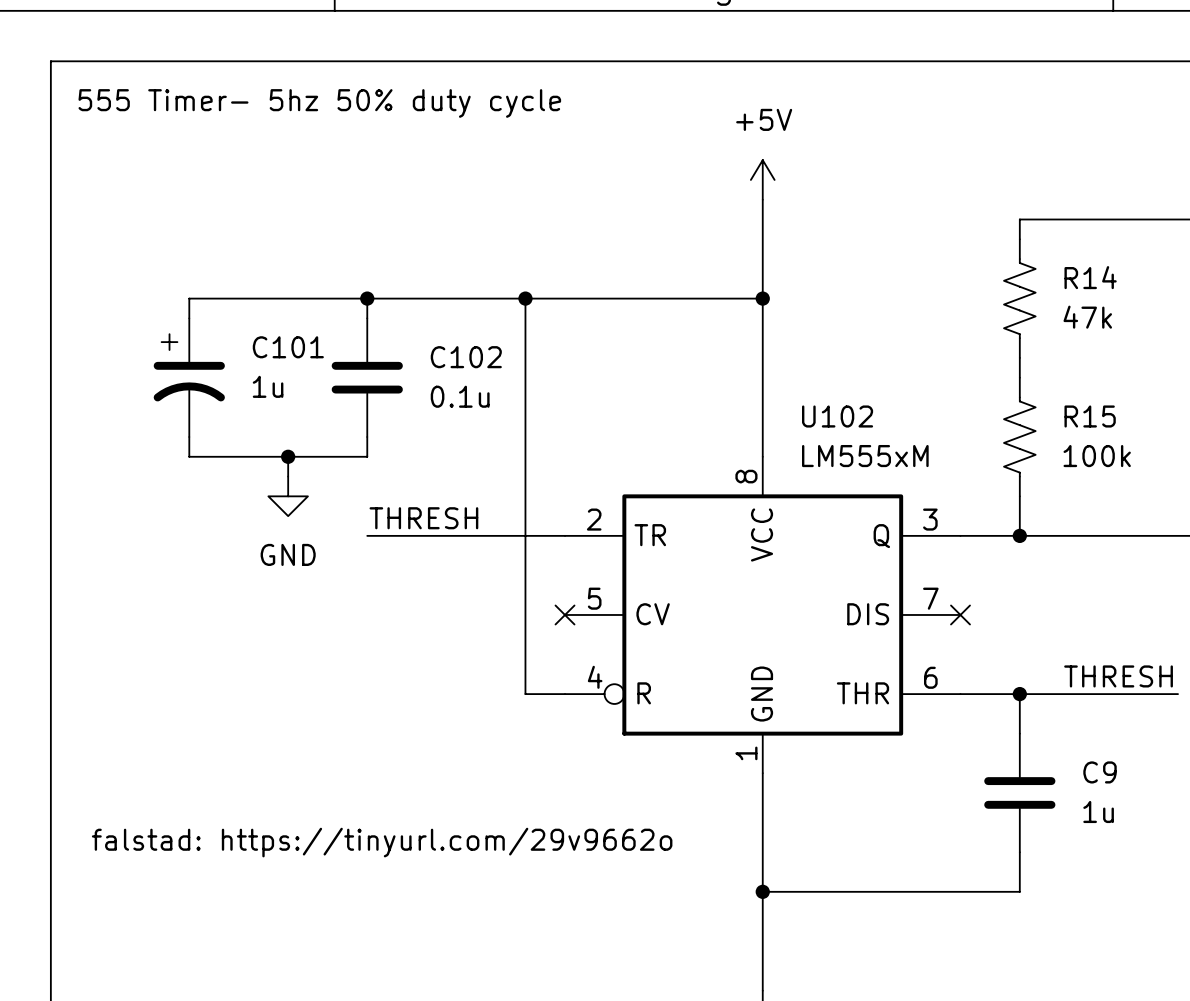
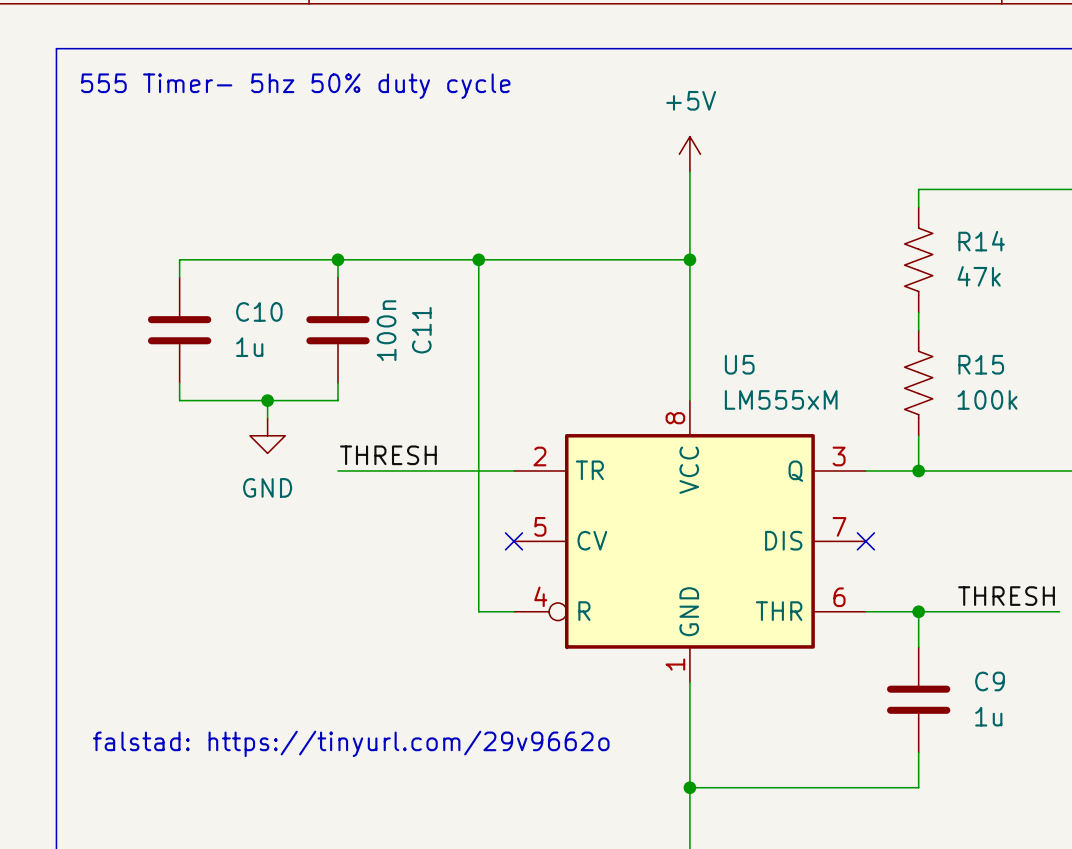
C102 name: C102 (466, 357) -> C11 (421, 330)
C101: 1u (189, 377) -> none
C10: none -> 1u (179, 330)
C102 value: 0.1u (460, 396) -> 100n (386, 330)
U102 name: U102 (837, 416) -> U5 (739, 364)

